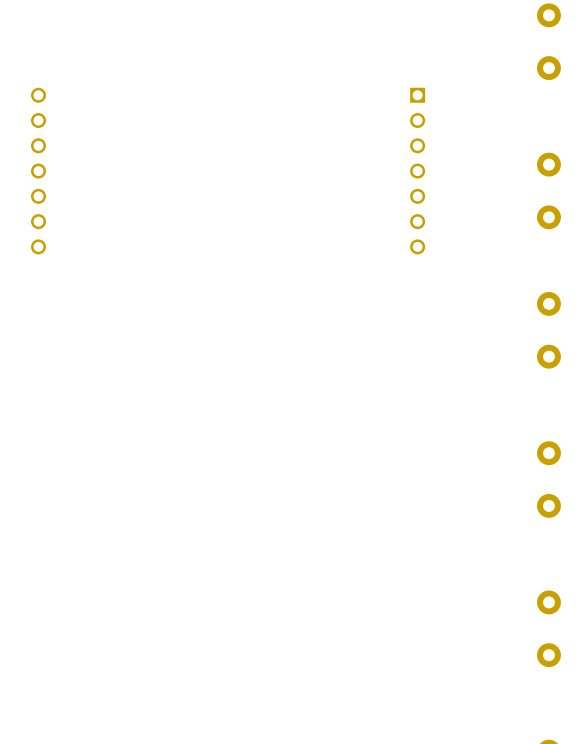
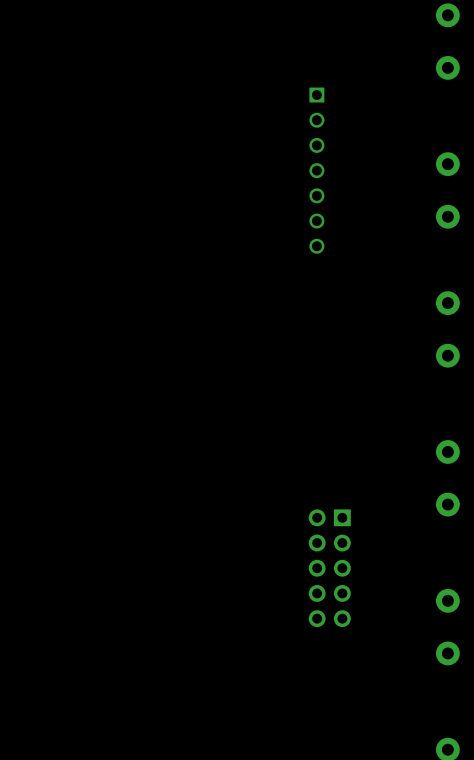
part: none -> (329, 568)

